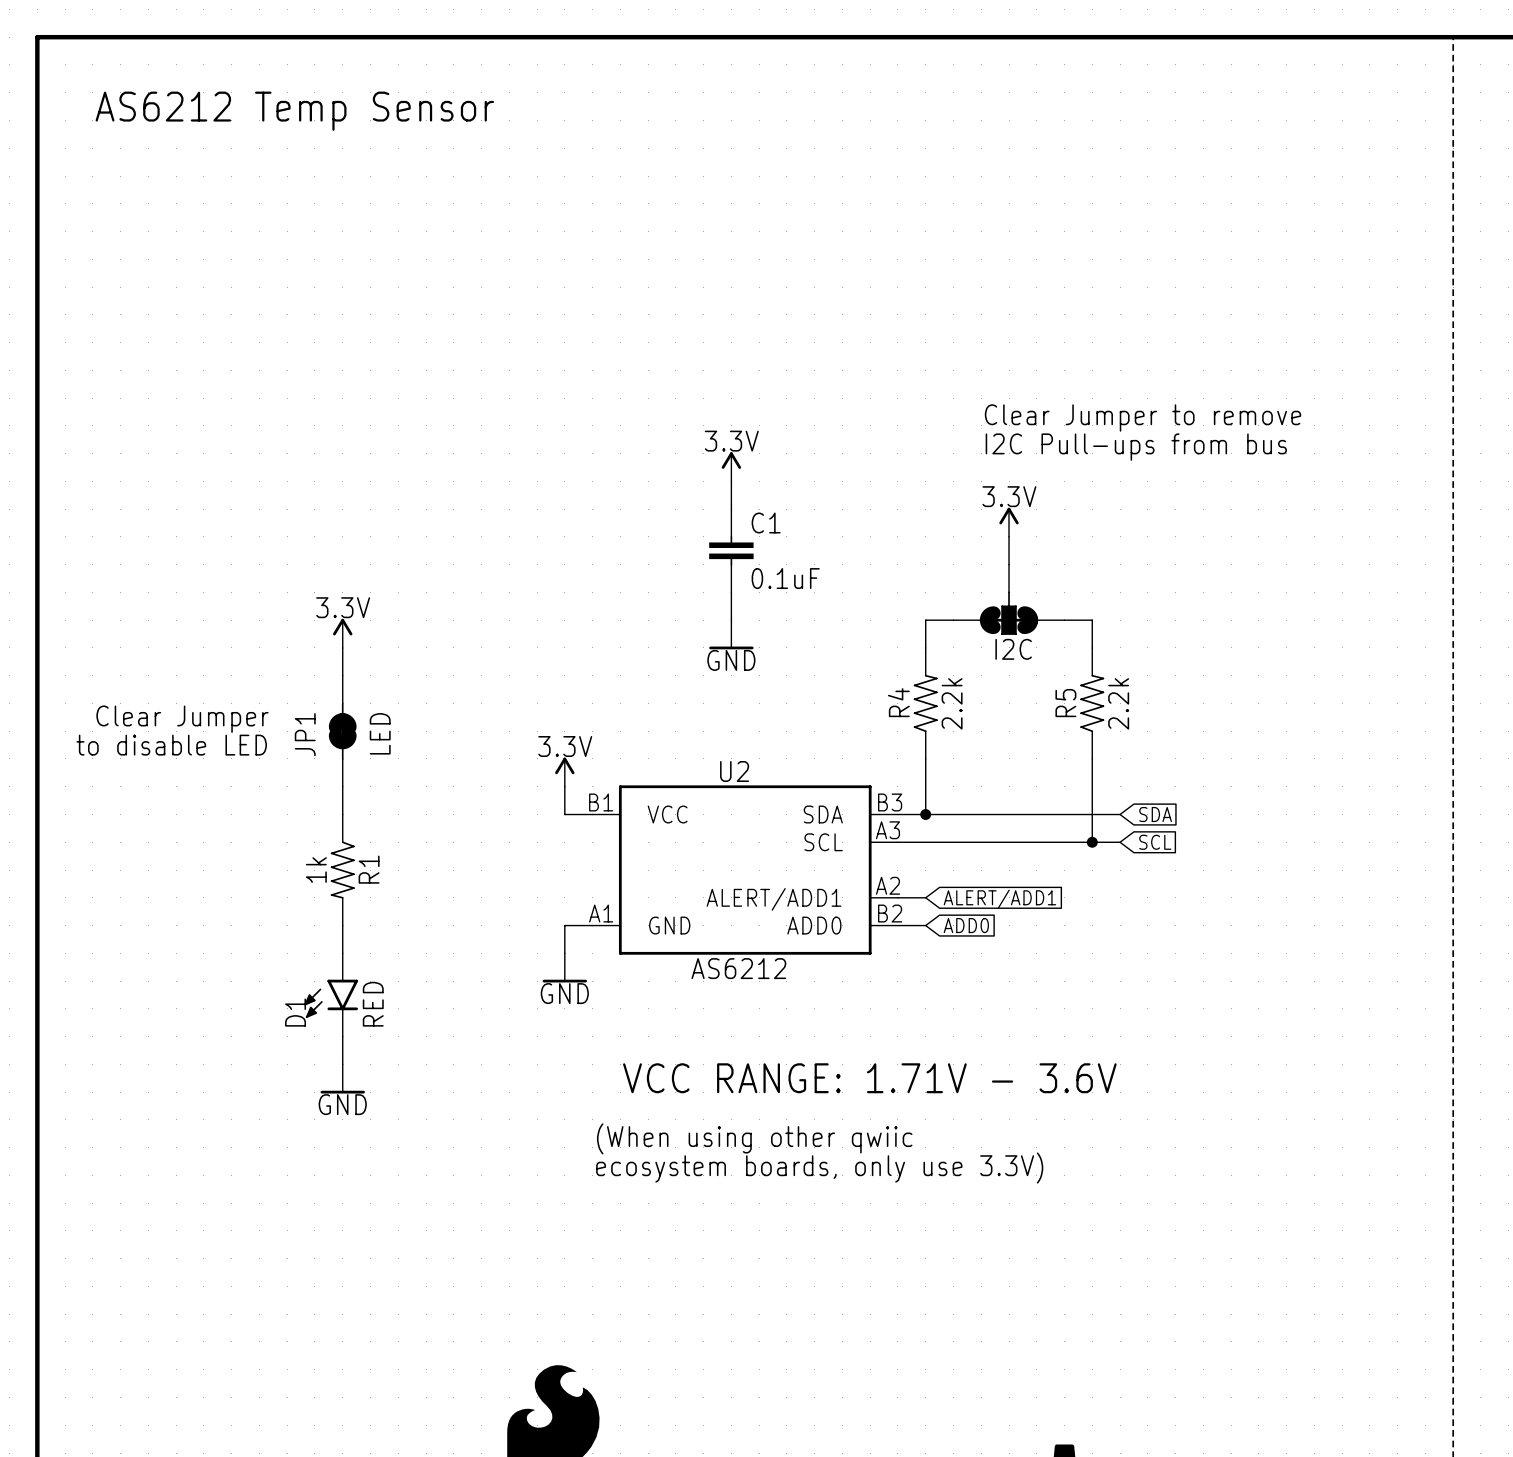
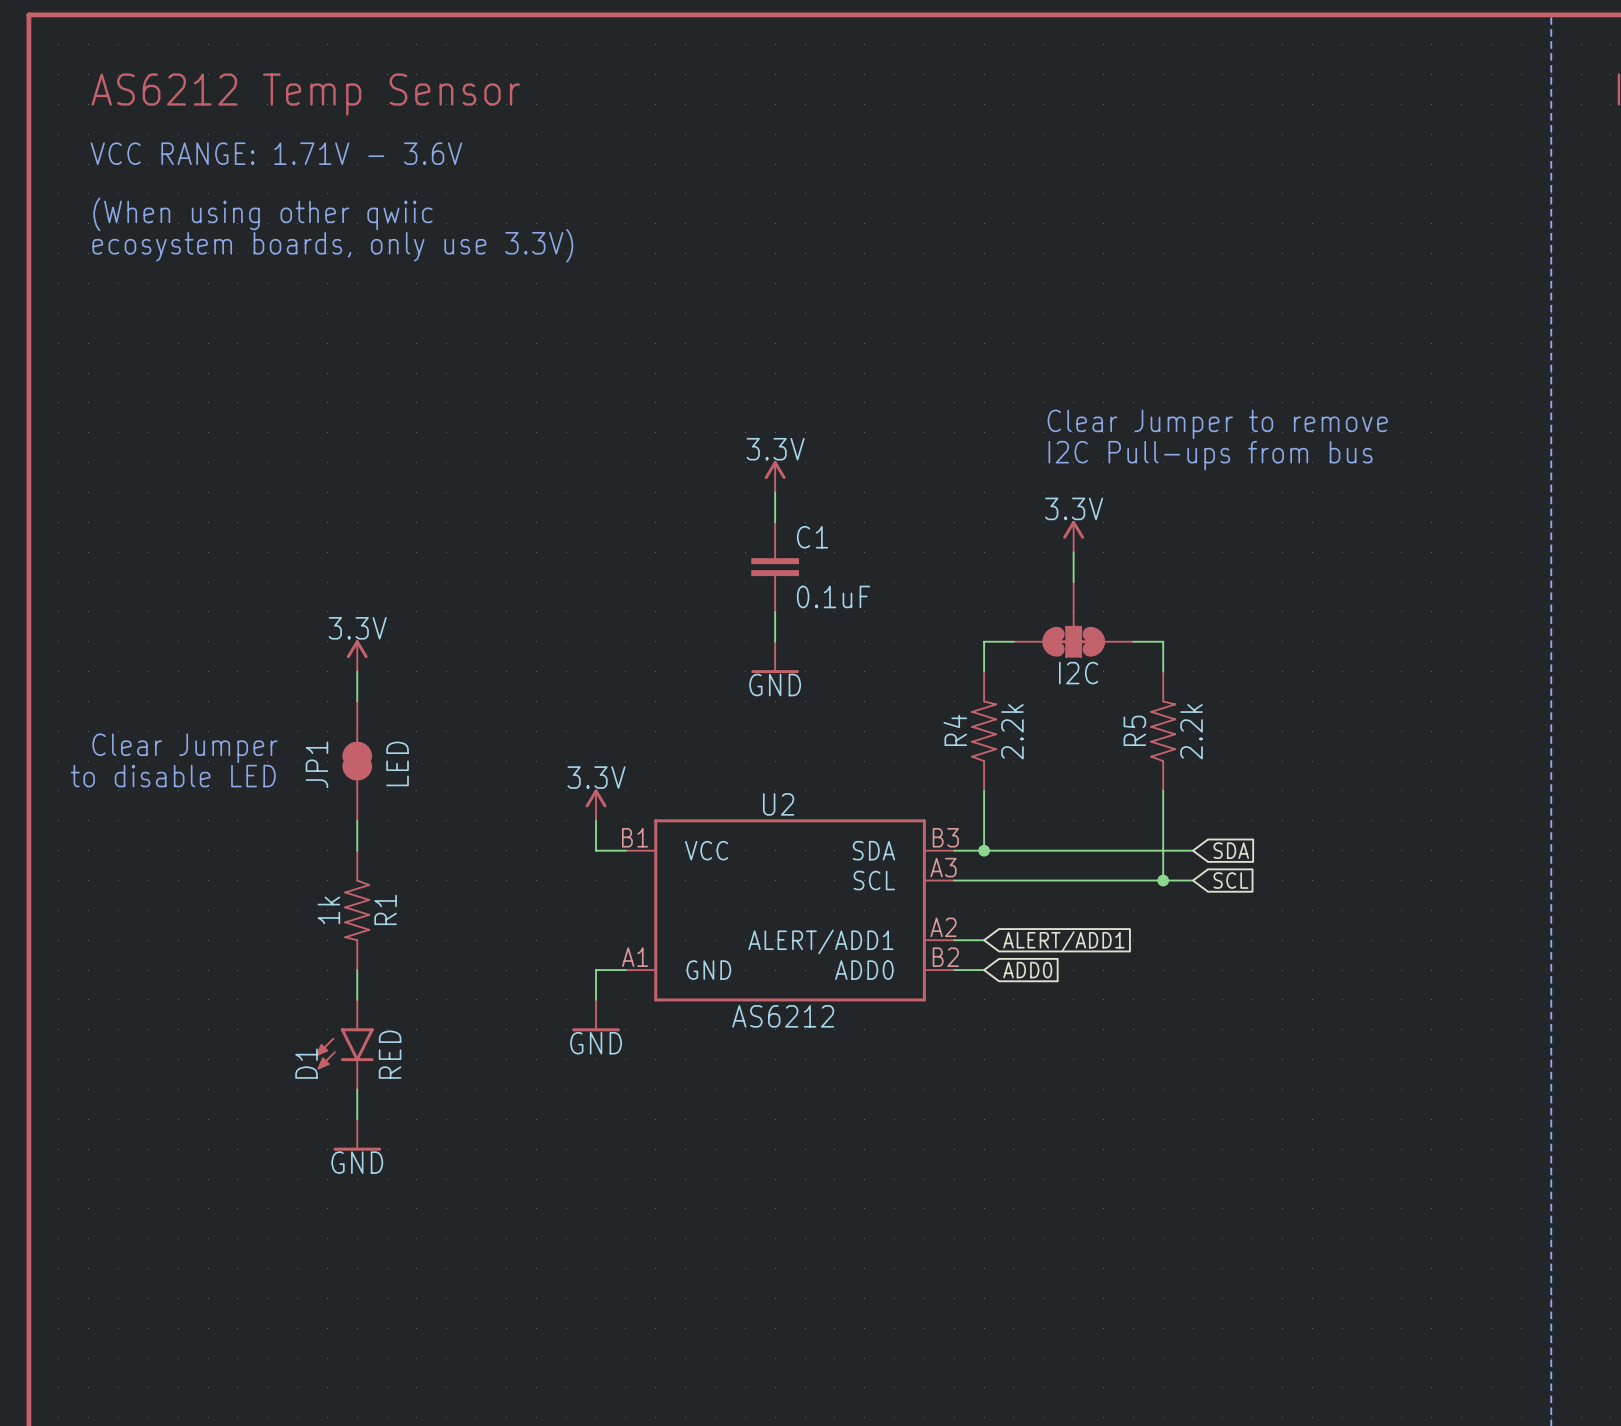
text: none -> VCC RANGE: 1.71V - 3.6V (276, 153)
text: none -> (When using other qwiic (262, 214)
text: none -> ecosystem boards, only use 3.3V) (332, 245)
text: VCC RANGE: 1.71V - 3.6V (869, 1078) -> none
text: (When using other qwiic (754, 1138) -> none
text: ecosystem boards, only use 3.3V) (819, 1168) -> none

